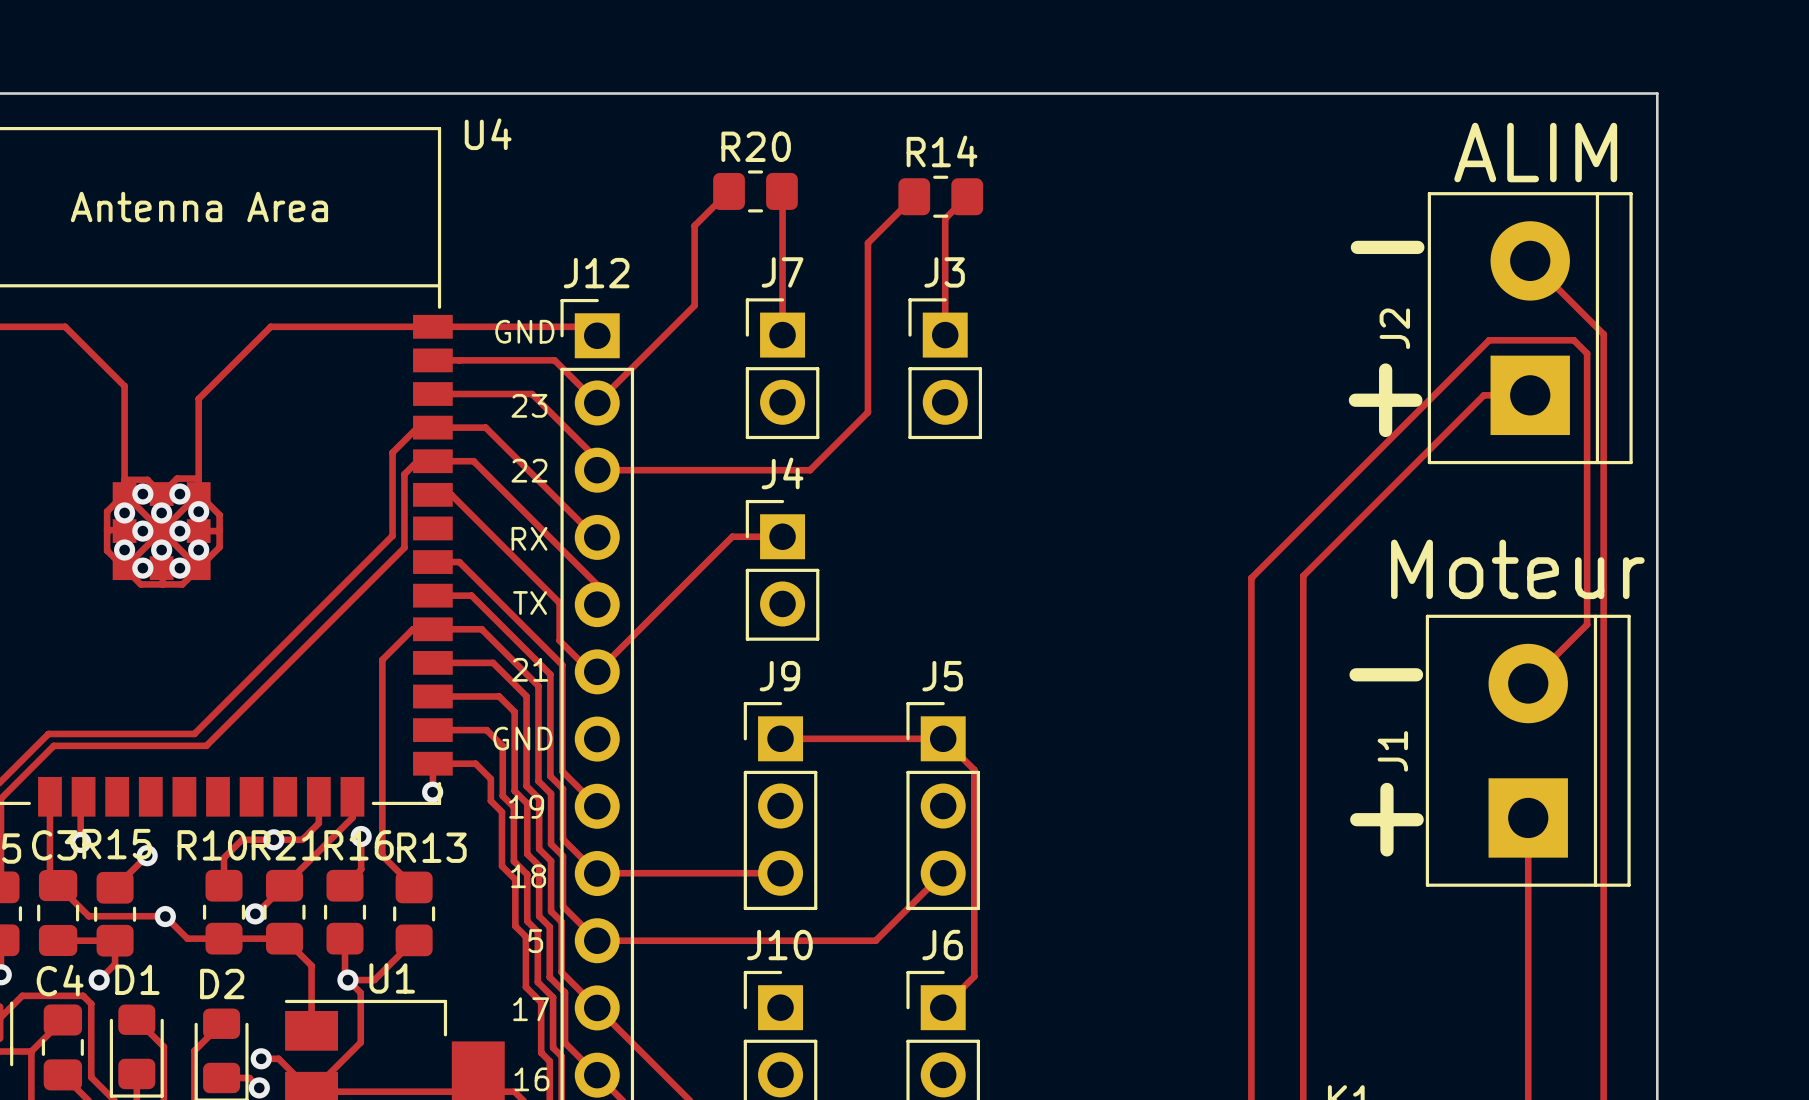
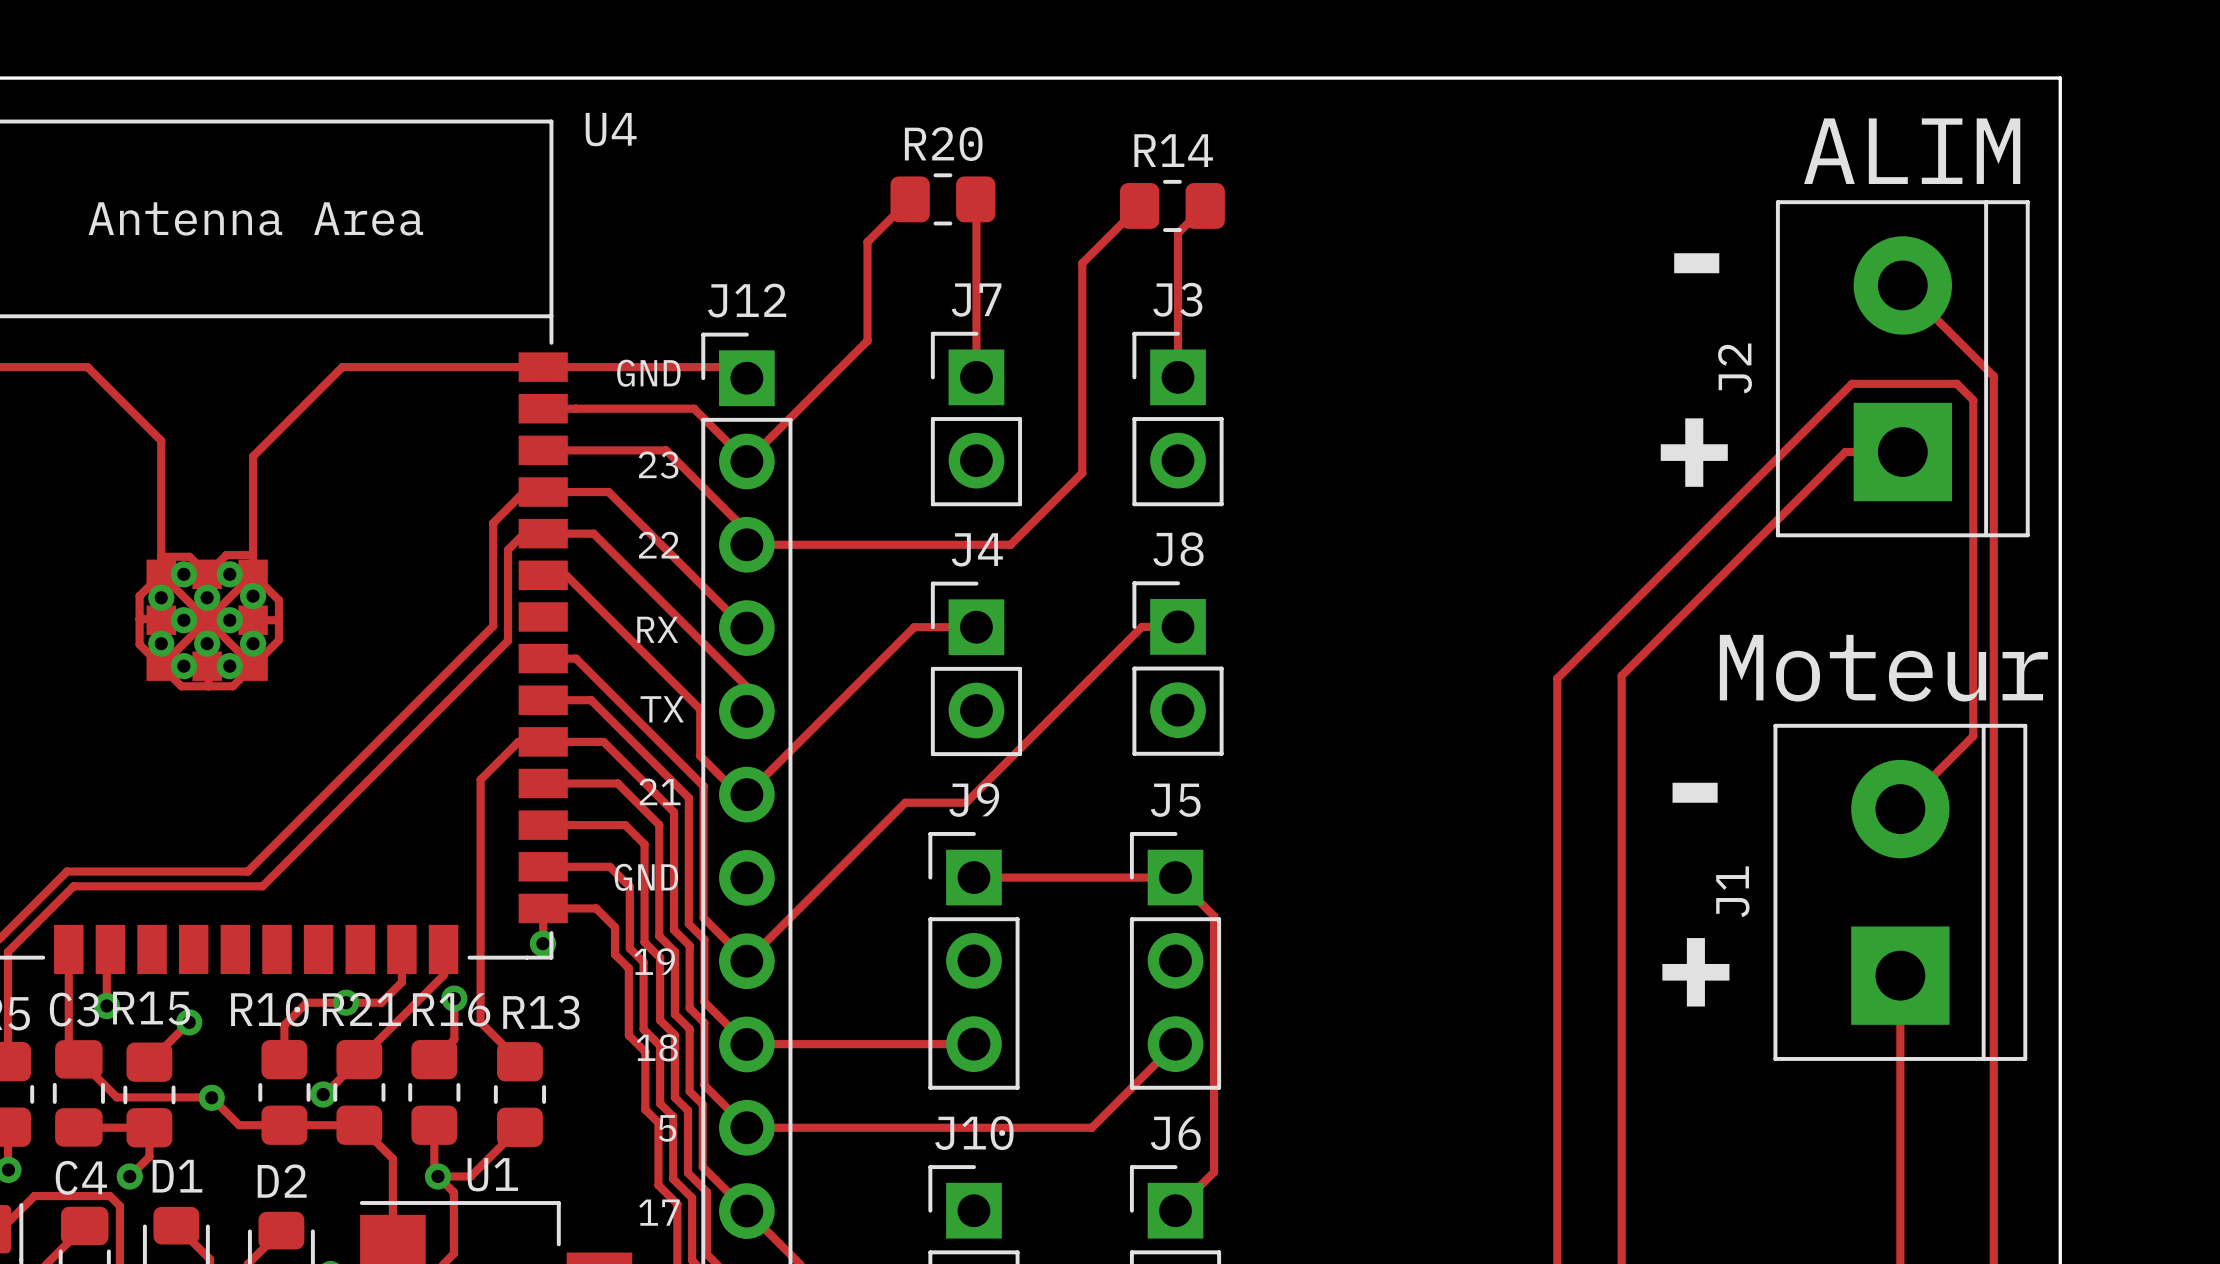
track: none -> (1178, 626) (1141, 626) (966, 802) (905, 802) (746, 961)
J8: none -> (1178, 668)

